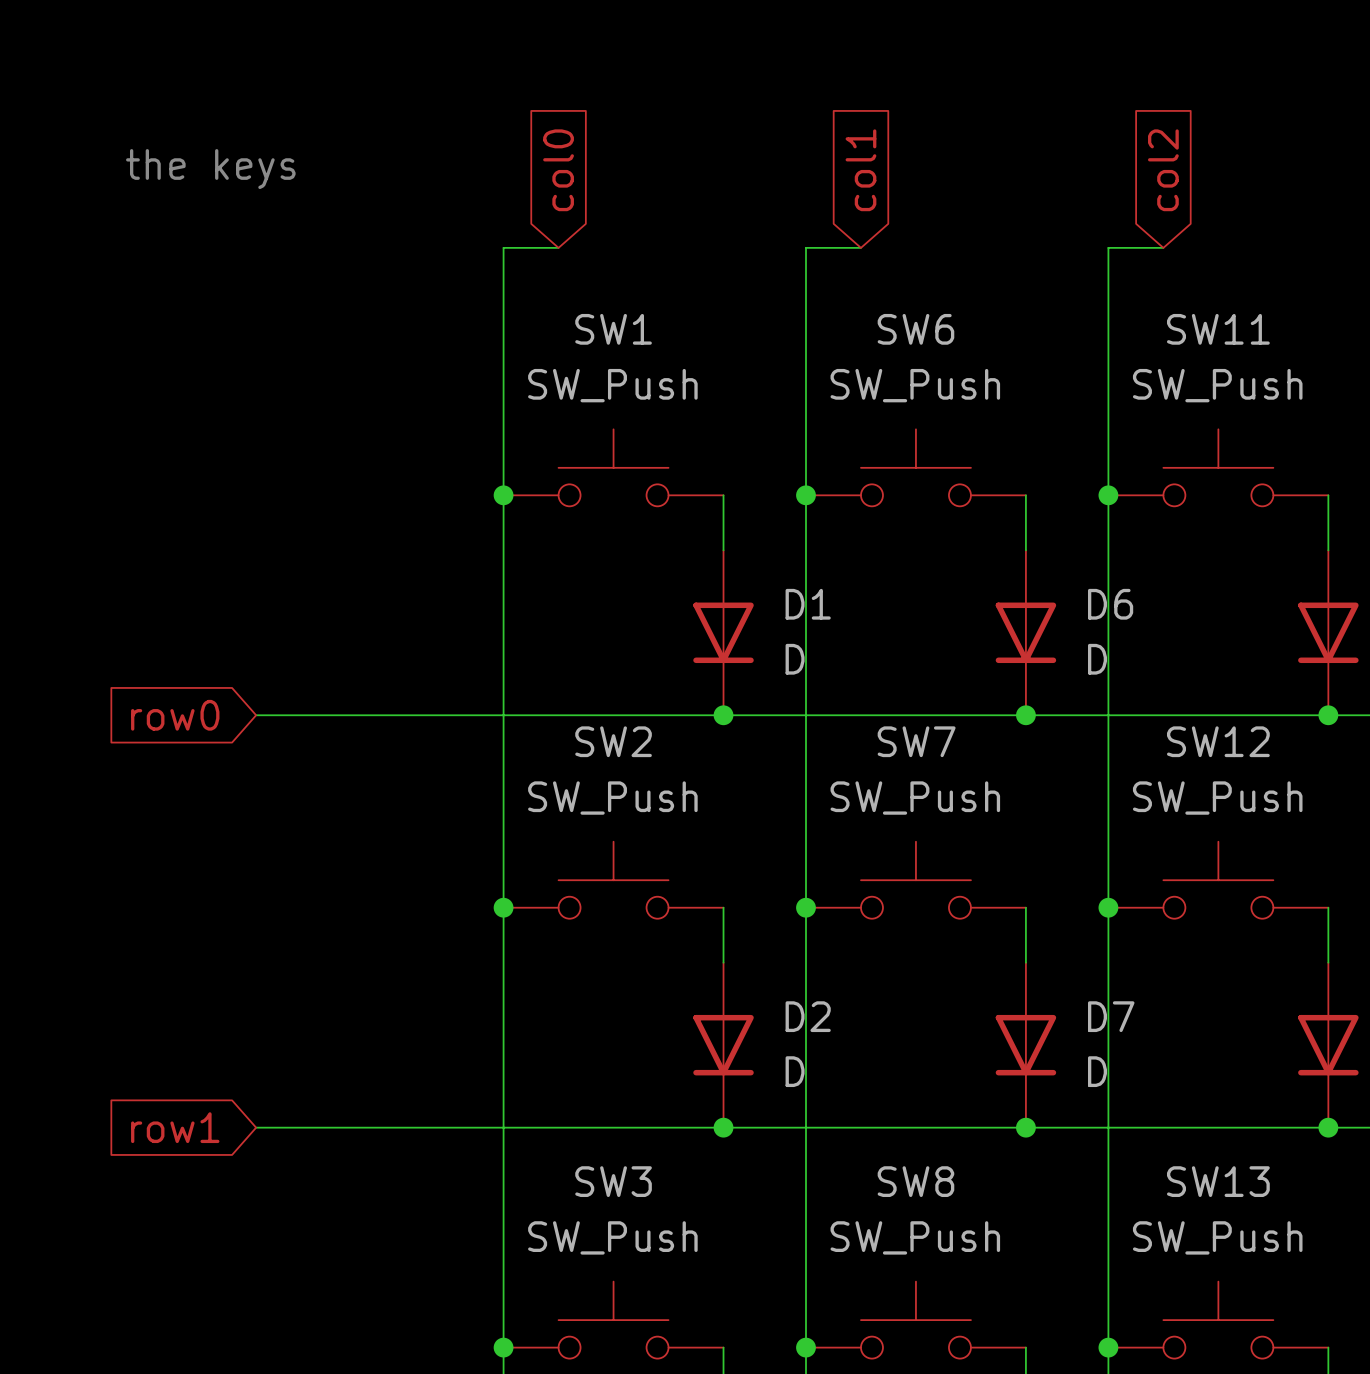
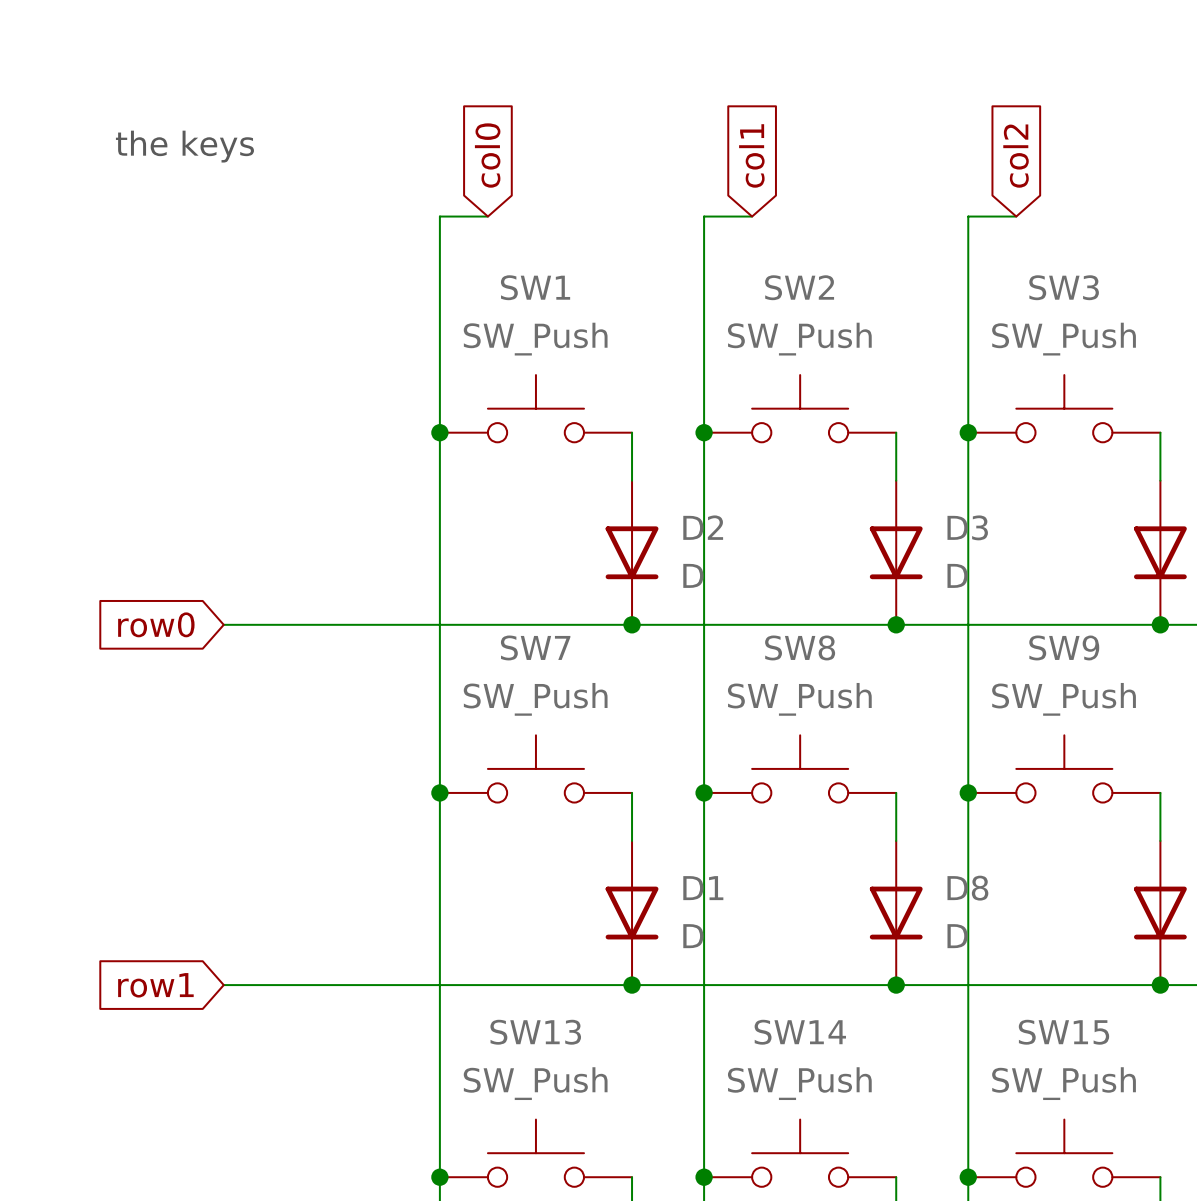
SW6 name: SW6 (915, 329) -> SW2 (799, 287)
SW11 name: SW11 (1218, 329) -> SW3 (1064, 287)
D1 name: D1 (808, 604) -> D2 (703, 527)
D6 name: D6 (1110, 604) -> D3 (967, 527)
SW2 name: SW2 (613, 741) -> SW7 (535, 647)
SW7 name: SW7 (916, 741) -> SW8 (800, 647)
SW12 name: SW12 (1218, 741) -> SW9 (1064, 647)
D2 name: D2 (808, 1016) -> D1 (703, 888)
D7 name: D7 (1111, 1016) -> D8 (967, 888)
SW3 name: SW3 (613, 1181) -> SW13 (535, 1032)
SW8 name: SW8 (915, 1181) -> SW14 (800, 1032)
SW13 name: SW13 (1218, 1181) -> SW15 (1063, 1032)

